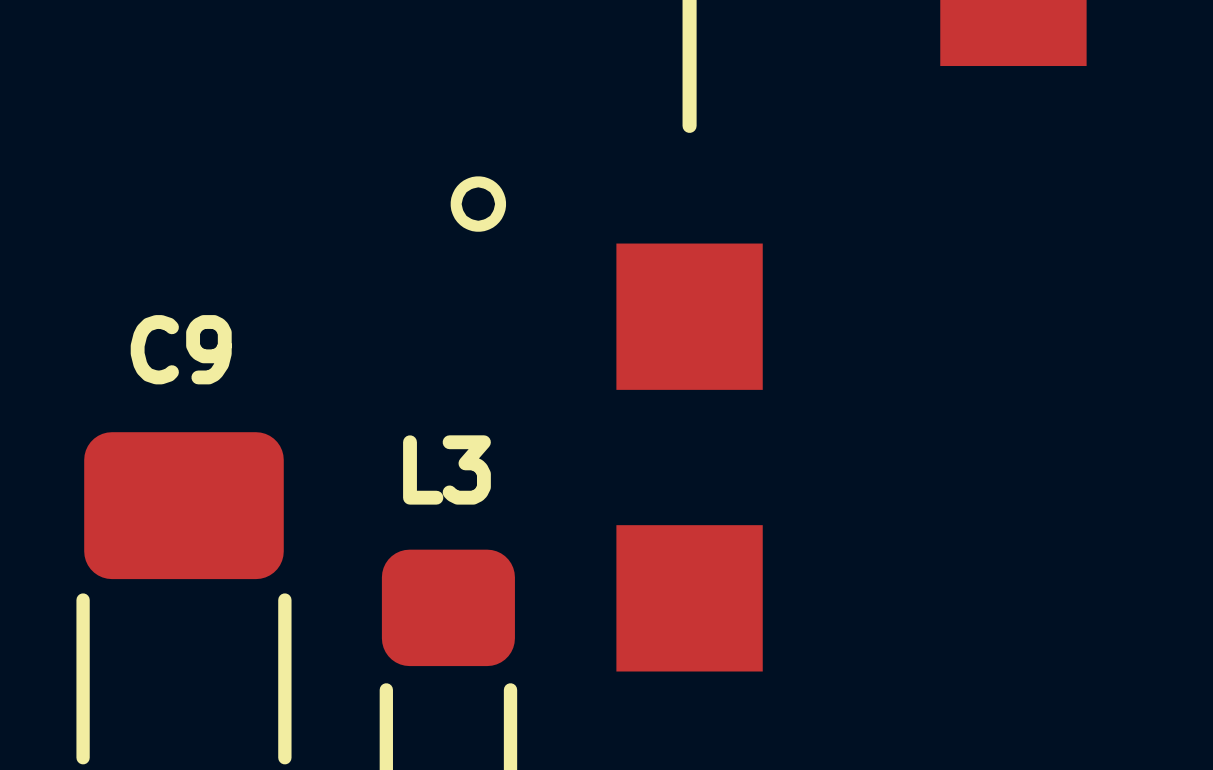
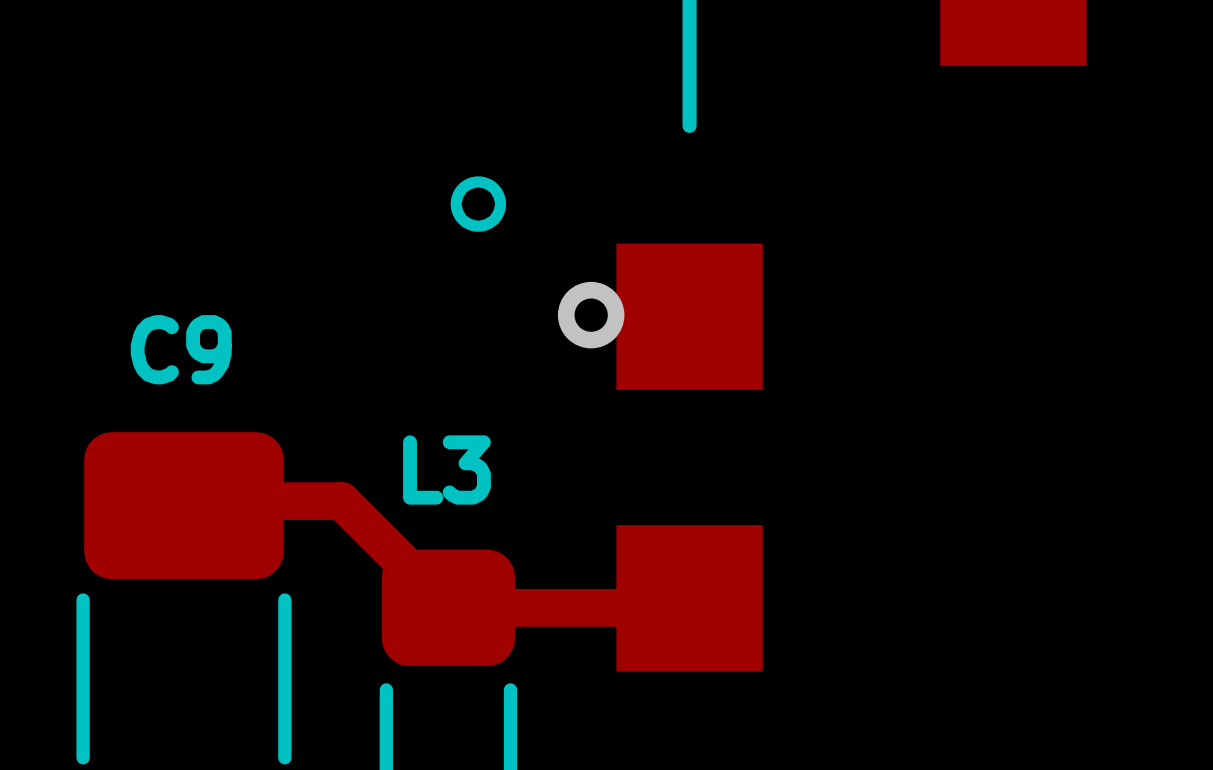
via: none -> (591, 315)
track: none -> (183, 501) (341, 501) (448, 607) (680, 607) (689, 598)

